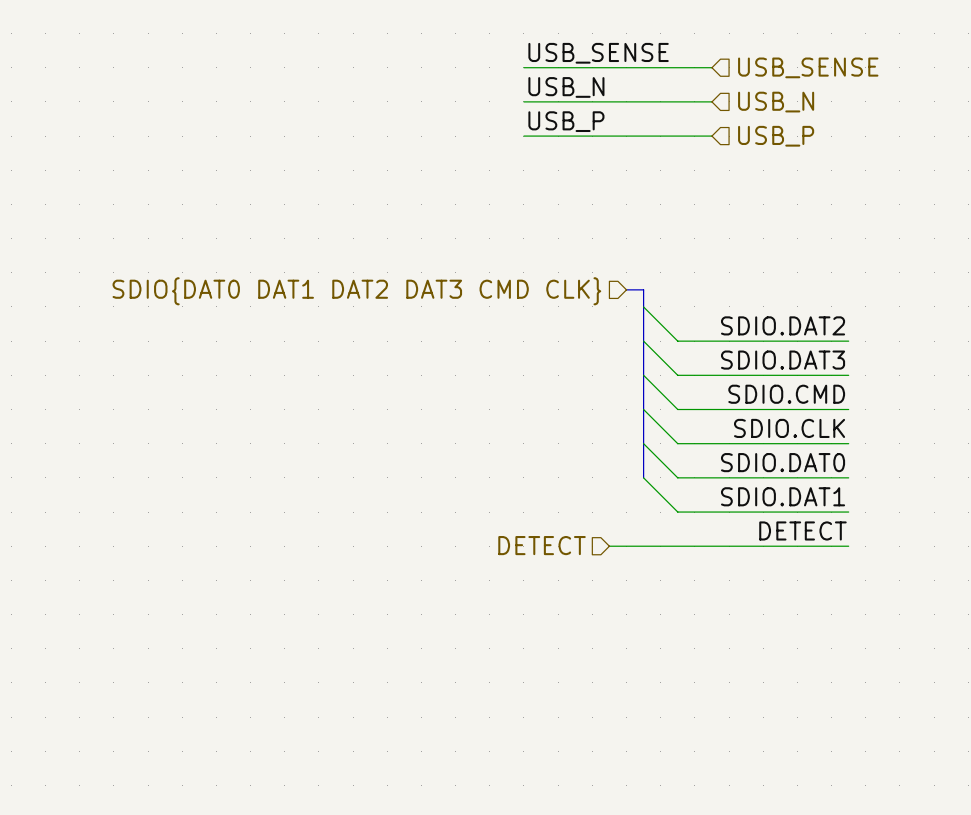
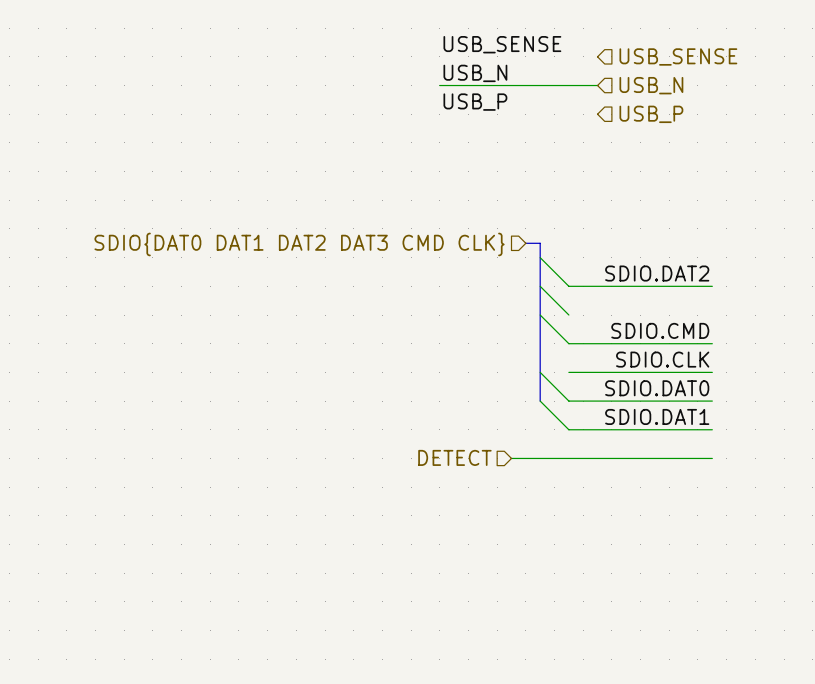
wire: (523, 67) (711, 67) -> none
wire: (523, 136) (711, 136) -> none
label: SDIO.DAT3 (783, 360) -> none
wire: (677, 375) (848, 375) -> none
wire: (643, 409) (677, 443) -> none
label: DETECT (802, 530) -> none

